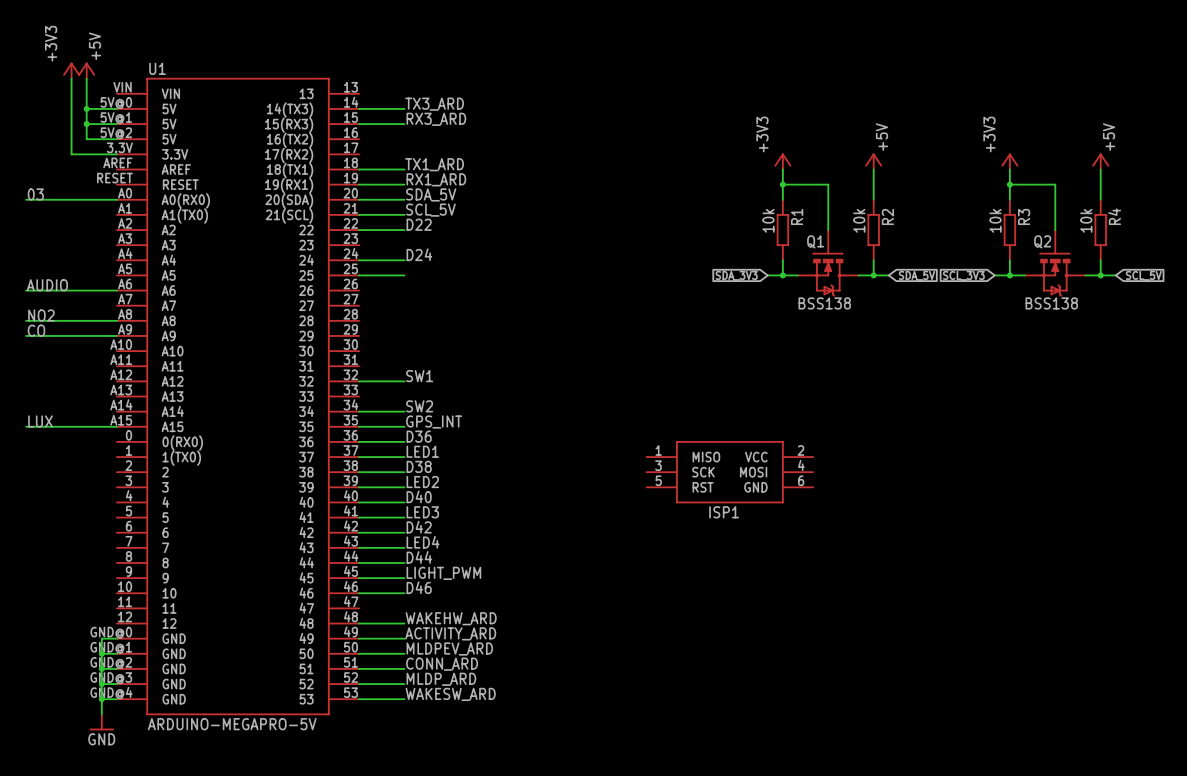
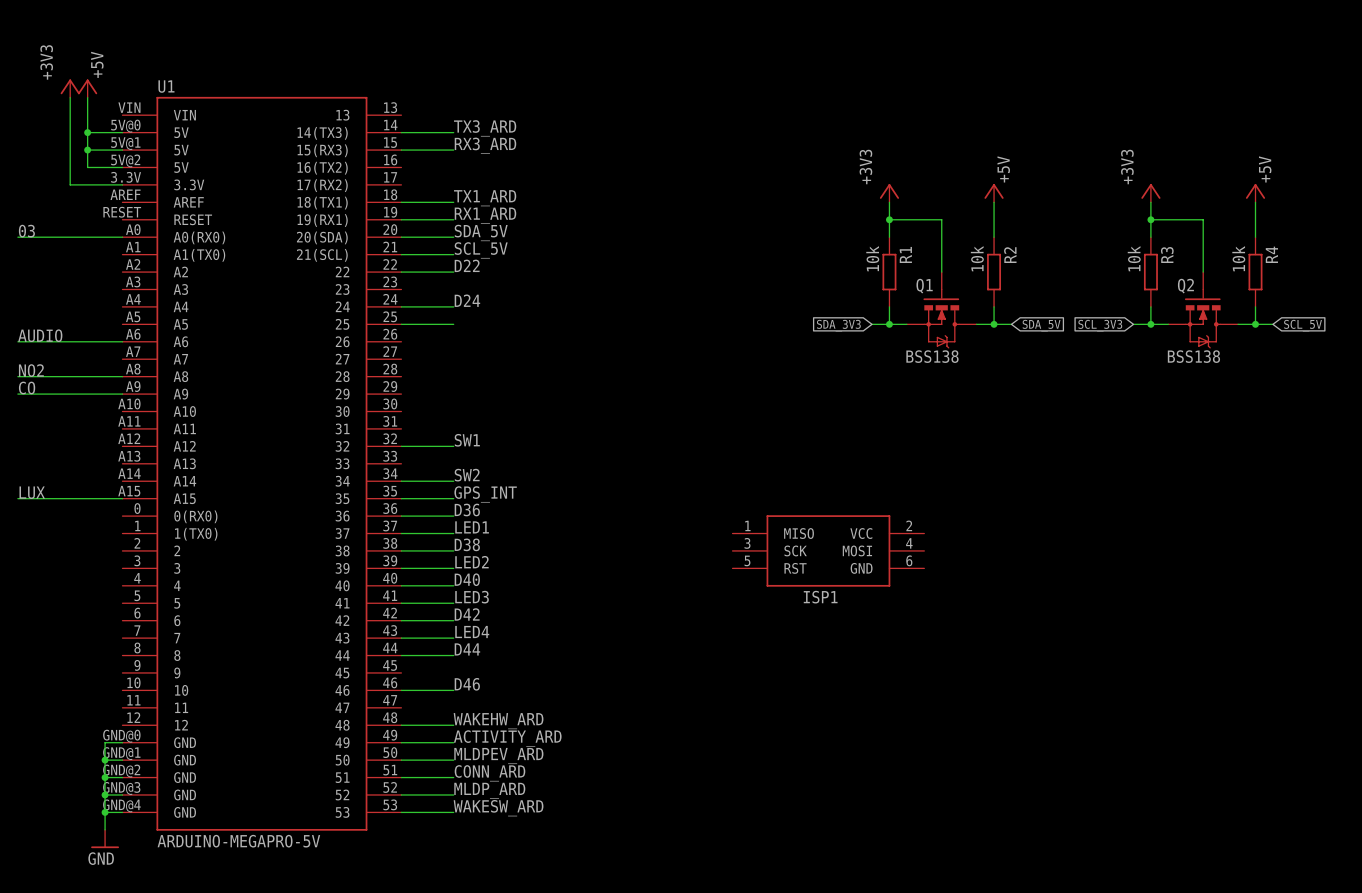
label: LIGHT_PWM (443, 573) -> none
wire: (359, 578) (404, 578) -> none

